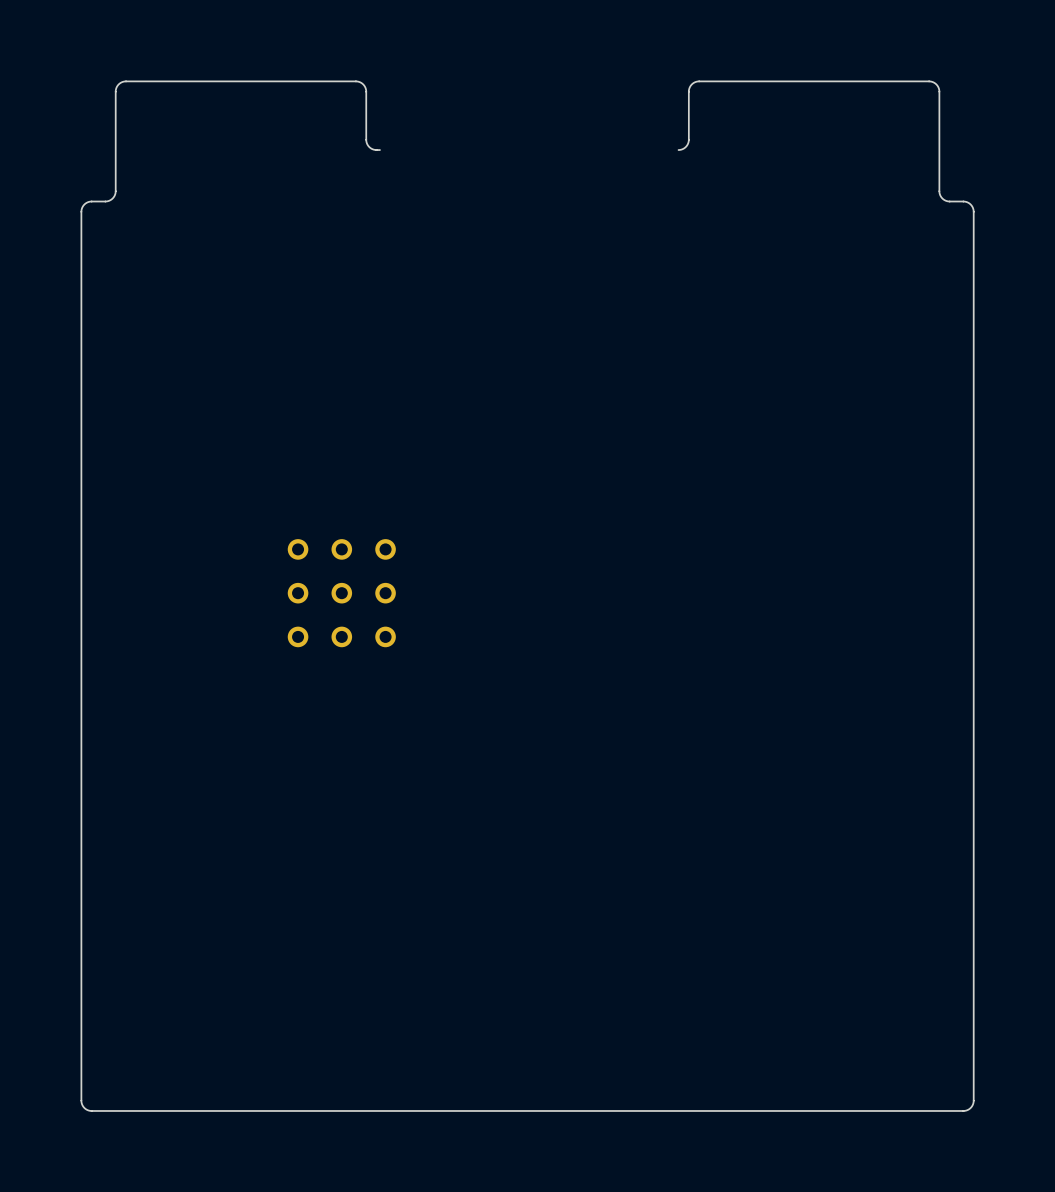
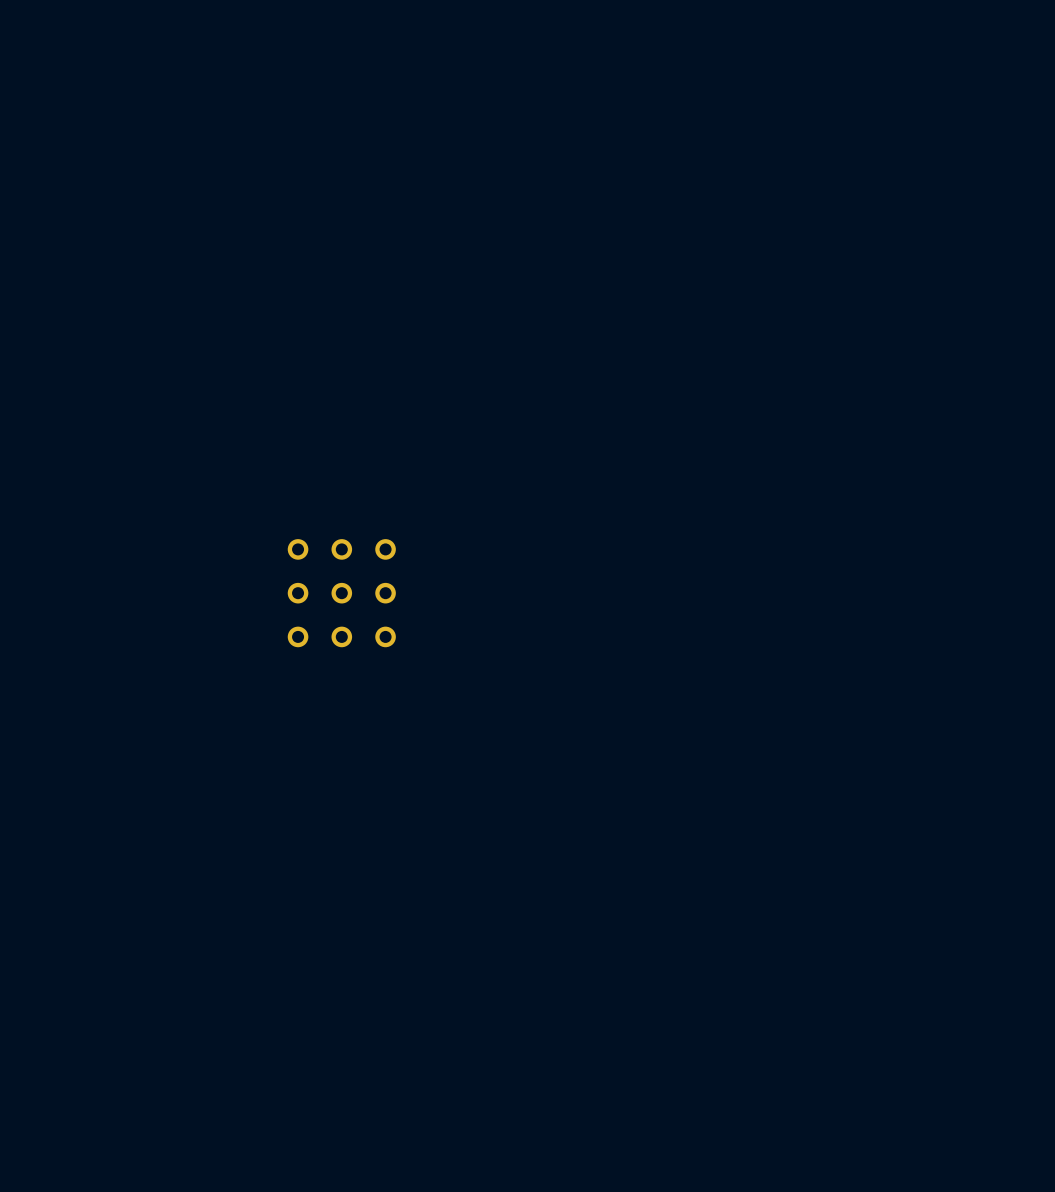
board edge: (678, 150) (684, 147) (688, 142) (688, 90) (690, 85) (696, 81) (929, 81) (935, 83) (939, 89) (939, 193) (947, 201) (968, 202) (973, 211) (972, 1105) (963, 1110) (89, 1110) (83, 1106) (81, 1100) (81, 211) (86, 202) (108, 201) (115, 193) (116, 89) (119, 83) (126, 81) (358, 81) (364, 85) (366, 90) (366, 142) (371, 148) (379, 150) -> none

